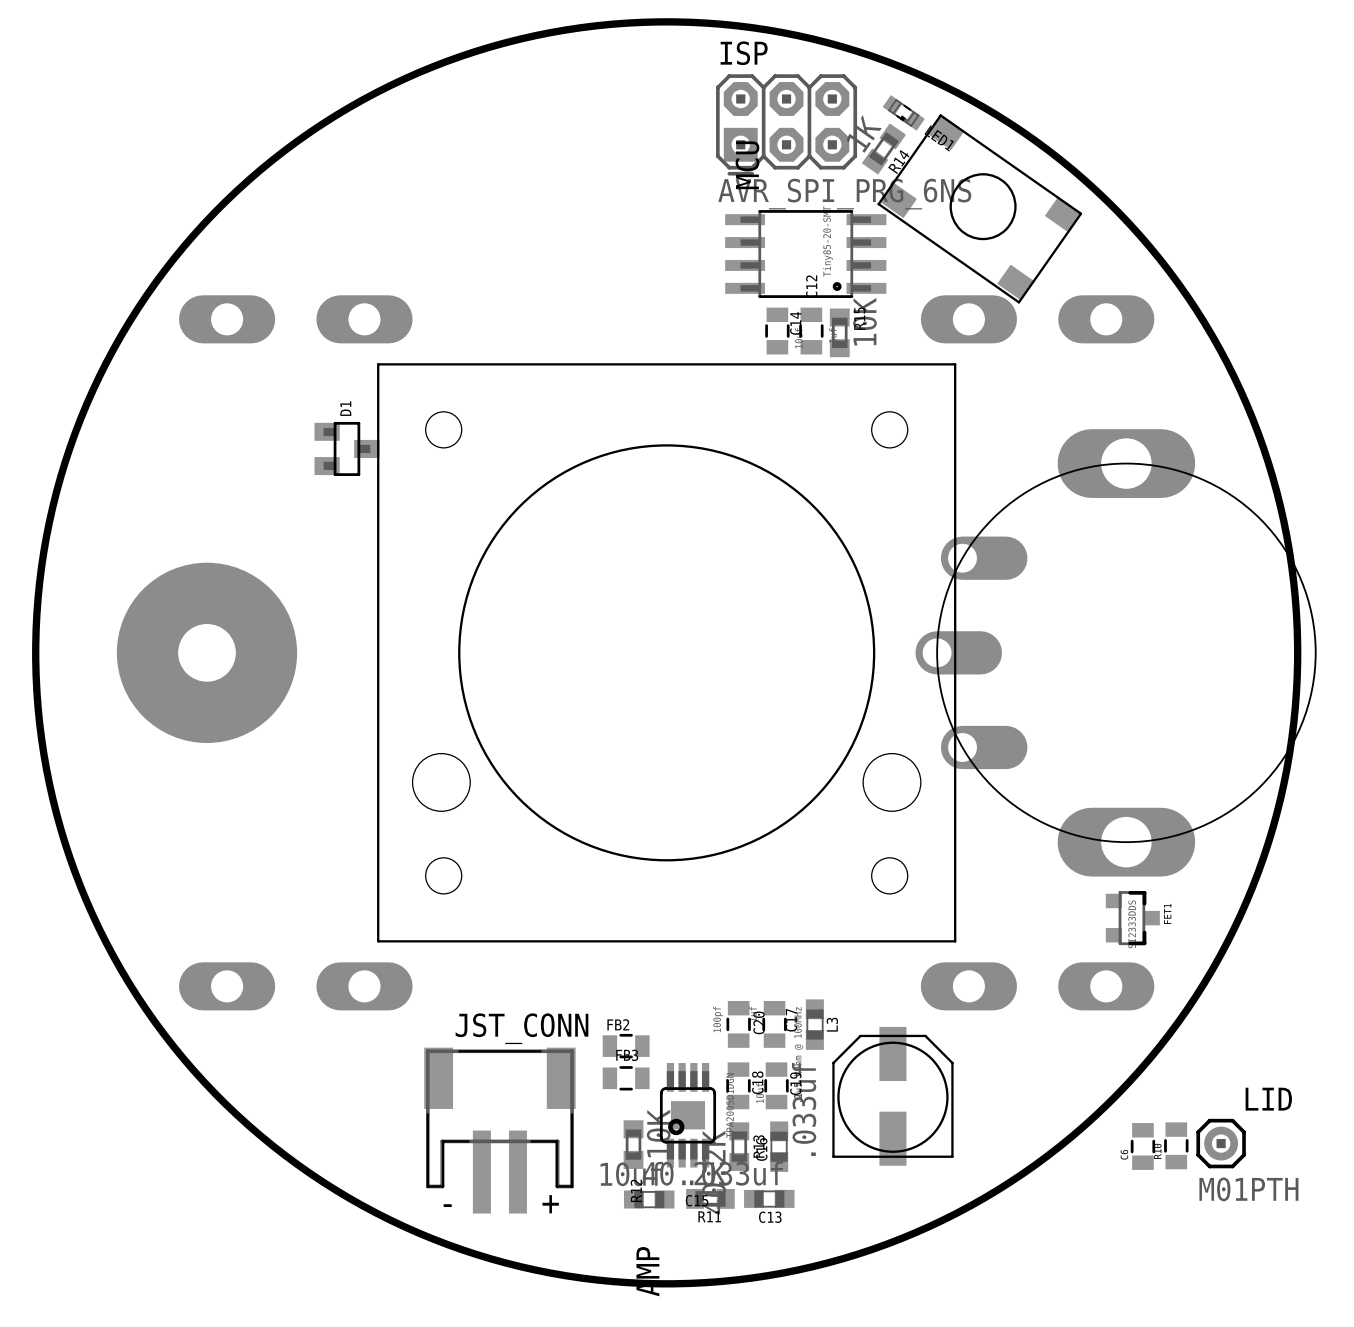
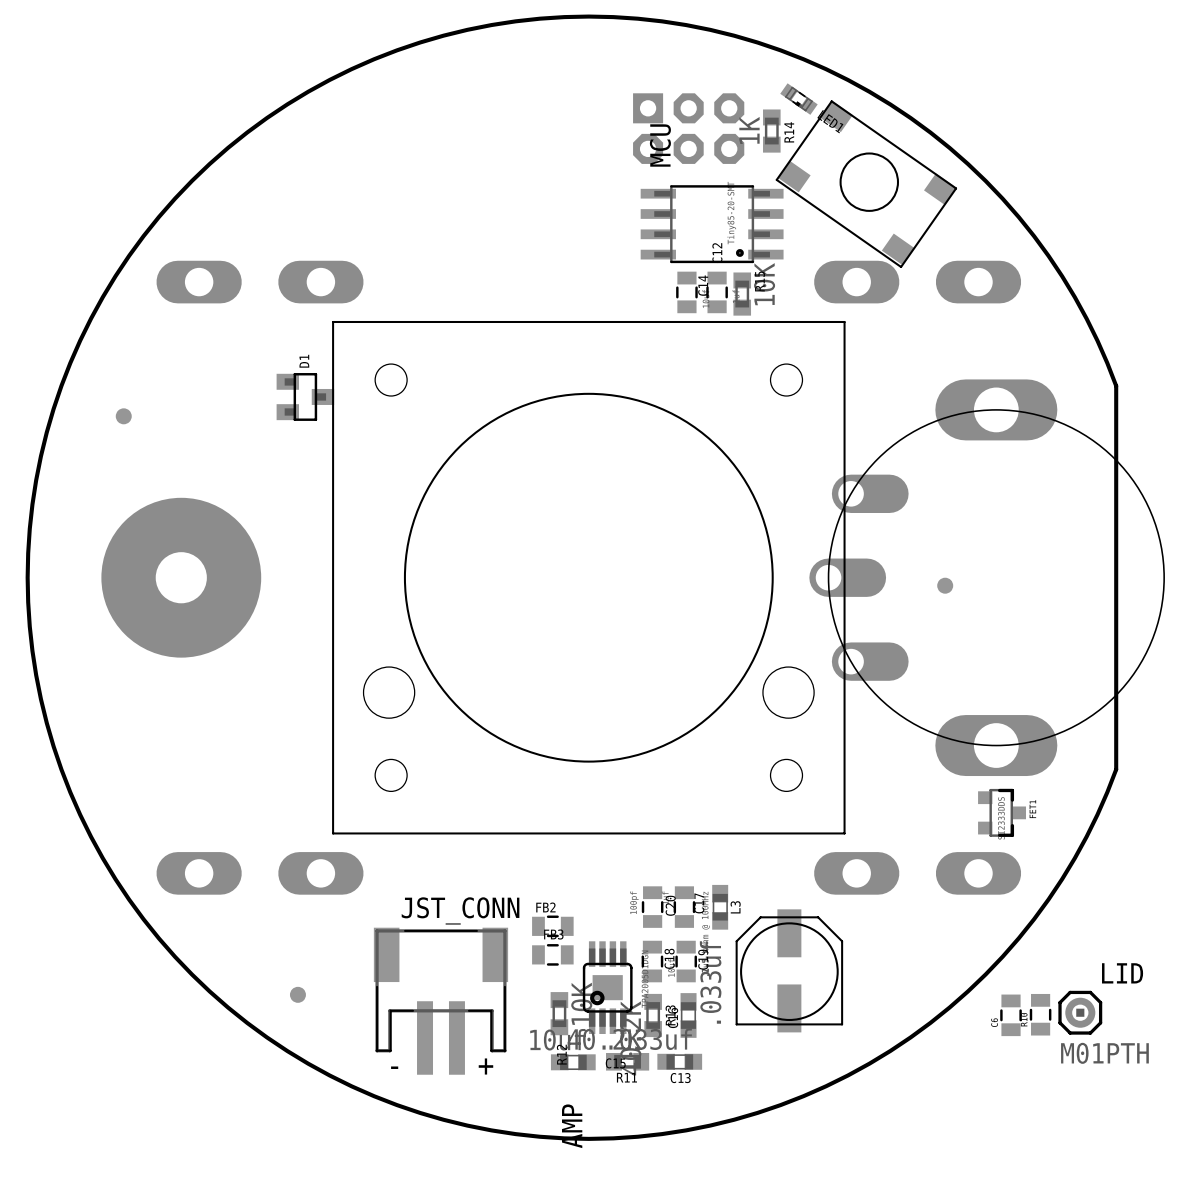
round board edge: [32, 18, 1302, 1288] -> none
ISP side: top (786, 124) -> bottom (688, 128)
R14 rotation: 0° (883, 148) -> 35° counterclockwise (771, 131)
board edge: none -> (1116, 385) (1116, 769) (1097, 814) (1074, 858) (1048, 899) (1018, 938) (968, 991) (930, 1022) (890, 1050) (848, 1075) (780, 1105) (734, 1119) (662, 1134) (613, 1138) (564, 1138) (515, 1134) (443, 1119) (396, 1105) (351, 1086) (287, 1051) (247, 1022) (209, 991) (175, 956) (143, 919) (115, 879) (91, 836) (61, 769) (46, 722) (36, 675) (29, 626) (28, 553) (32, 504) (46, 432) (61, 385) (80, 340) (102, 297) (129, 255) (175, 198) (209, 163) (247, 132) (287, 104) (329, 79) (396, 50) (443, 35) (515, 21) (564, 17) (613, 17) (662, 21) (734, 35) (780, 50) (826, 69) (890, 104) (930, 132) (968, 164) (1002, 198) (1034, 236) (1062, 276) (1097, 340) (1116, 385)
part: none -> (123, 416)
part: none -> (945, 585)
part: none -> (297, 994)

